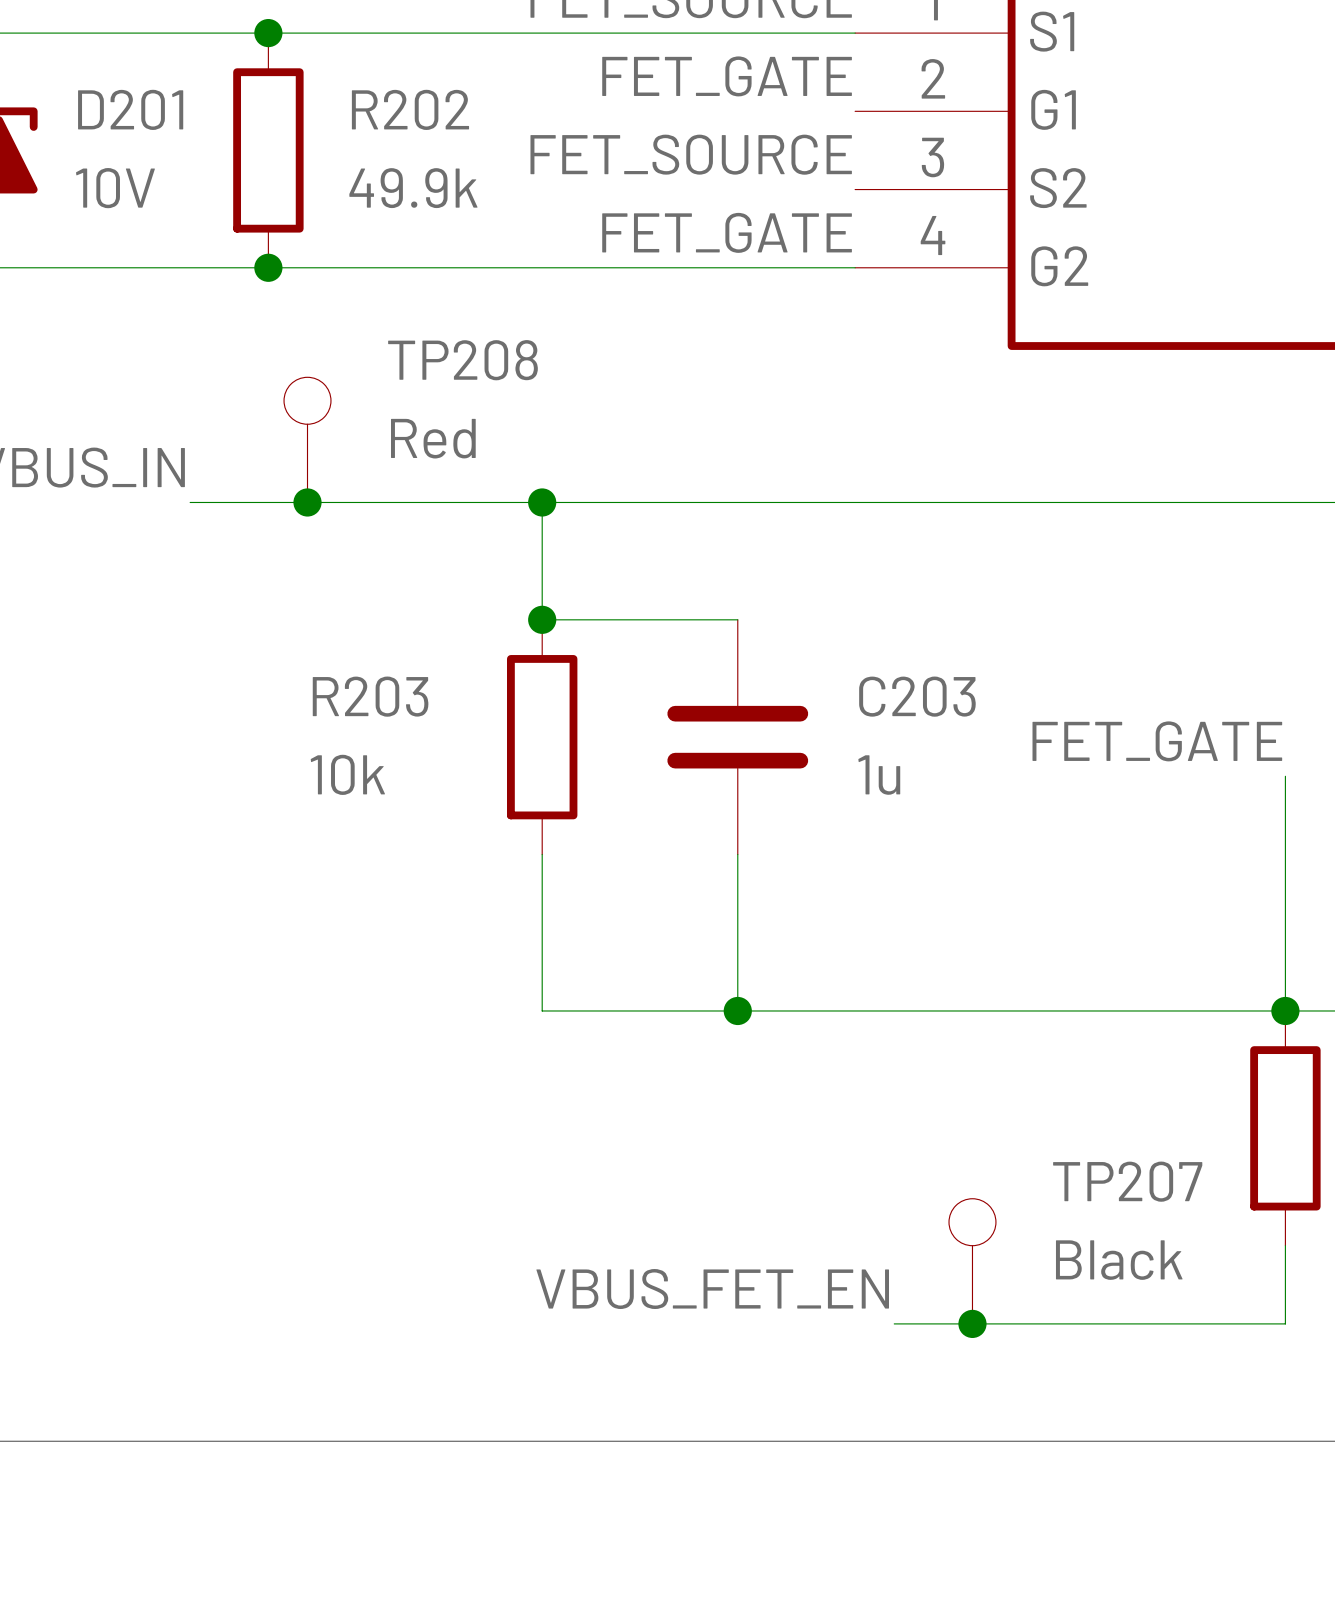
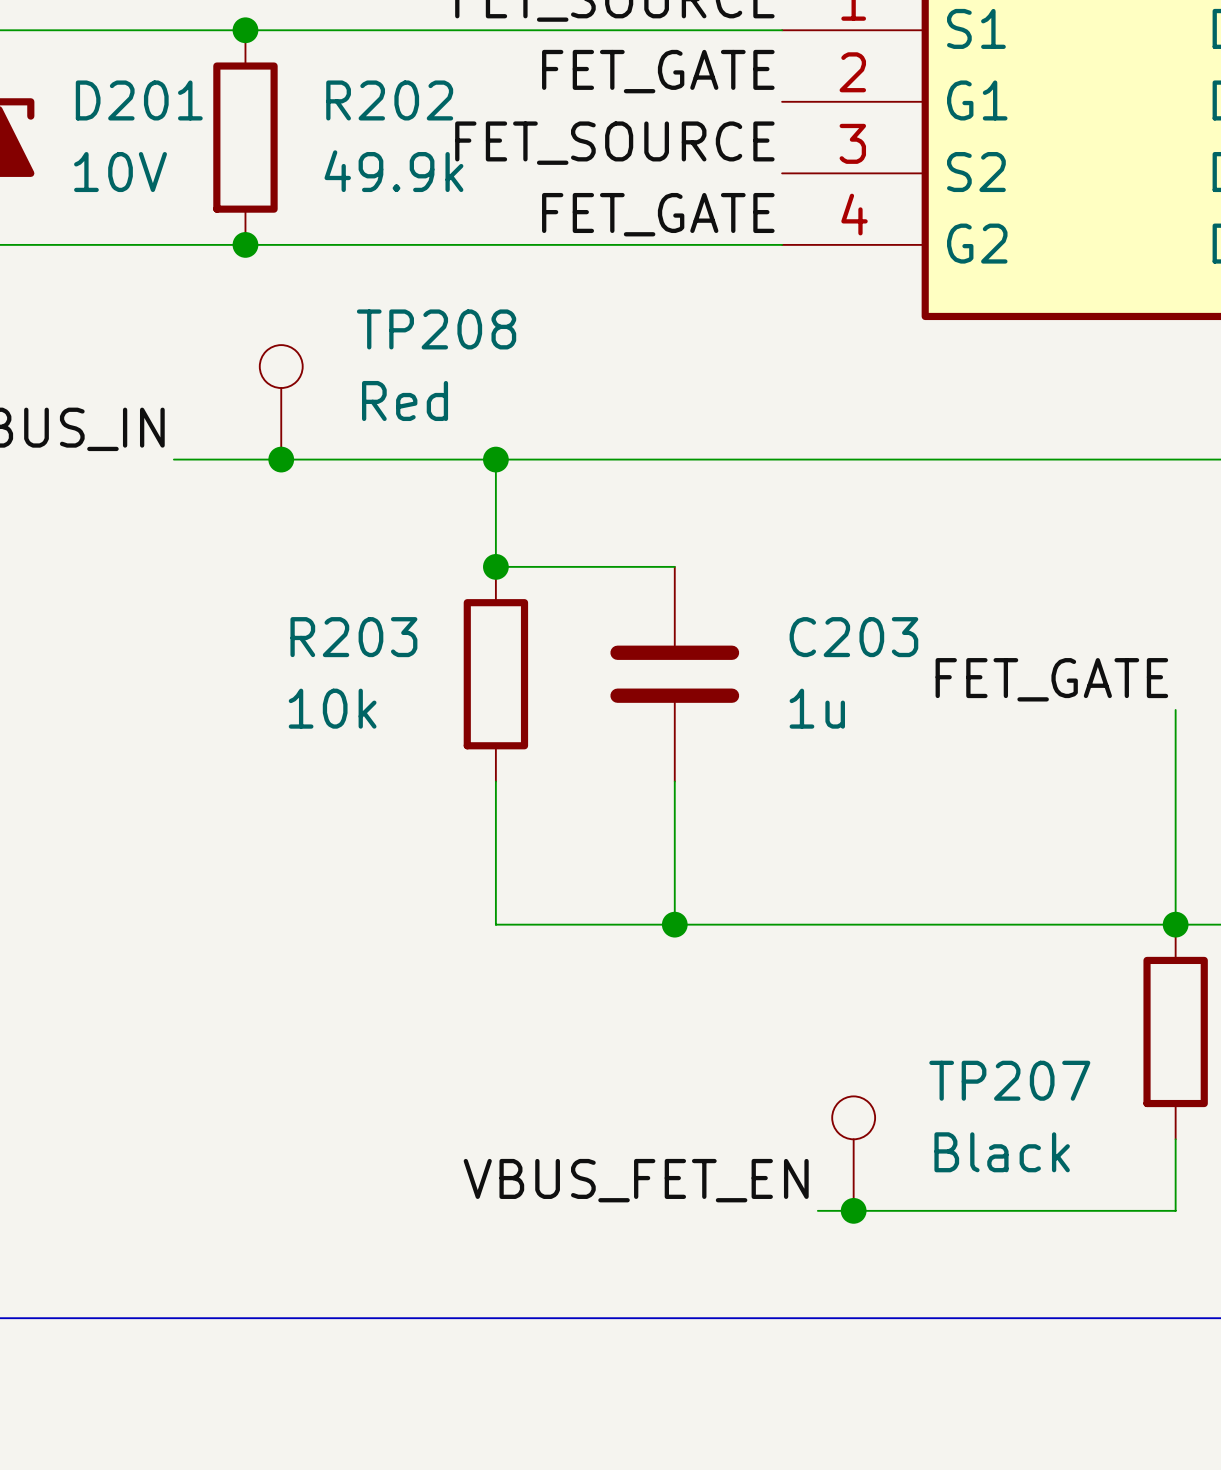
TP207 position: (972, 1261) -> (853, 1153)
junction position: (972, 1323) -> (853, 1210)

